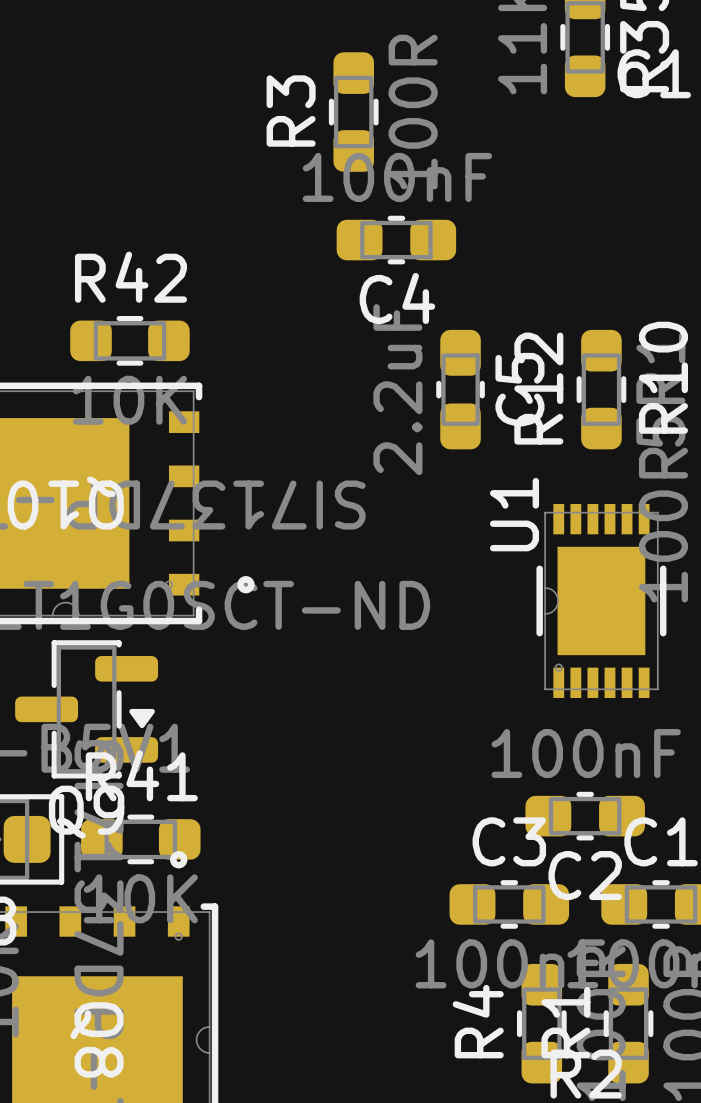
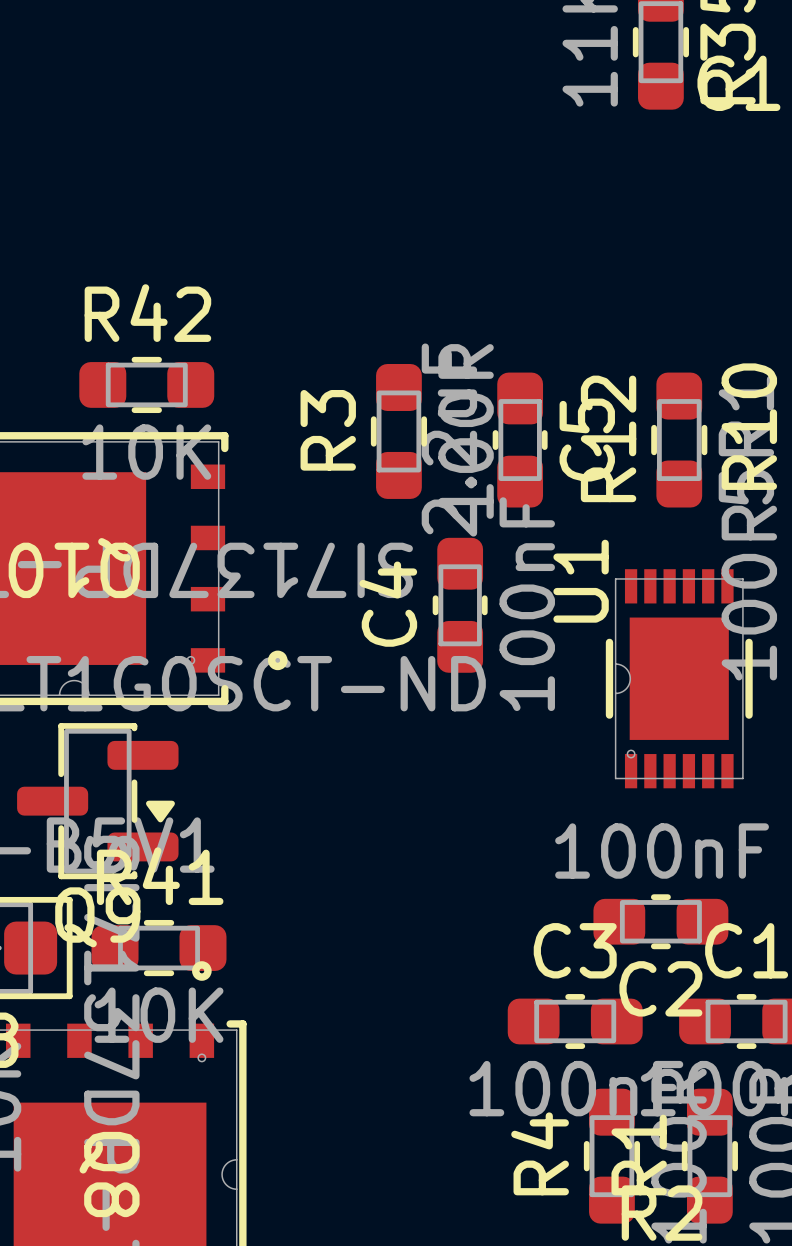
R3 position: (353, 112) -> (398, 431)
C4 rotation: 0° (396, 240) -> 90° clockwise (460, 605)
C4 position: (396, 240) -> (460, 605)

